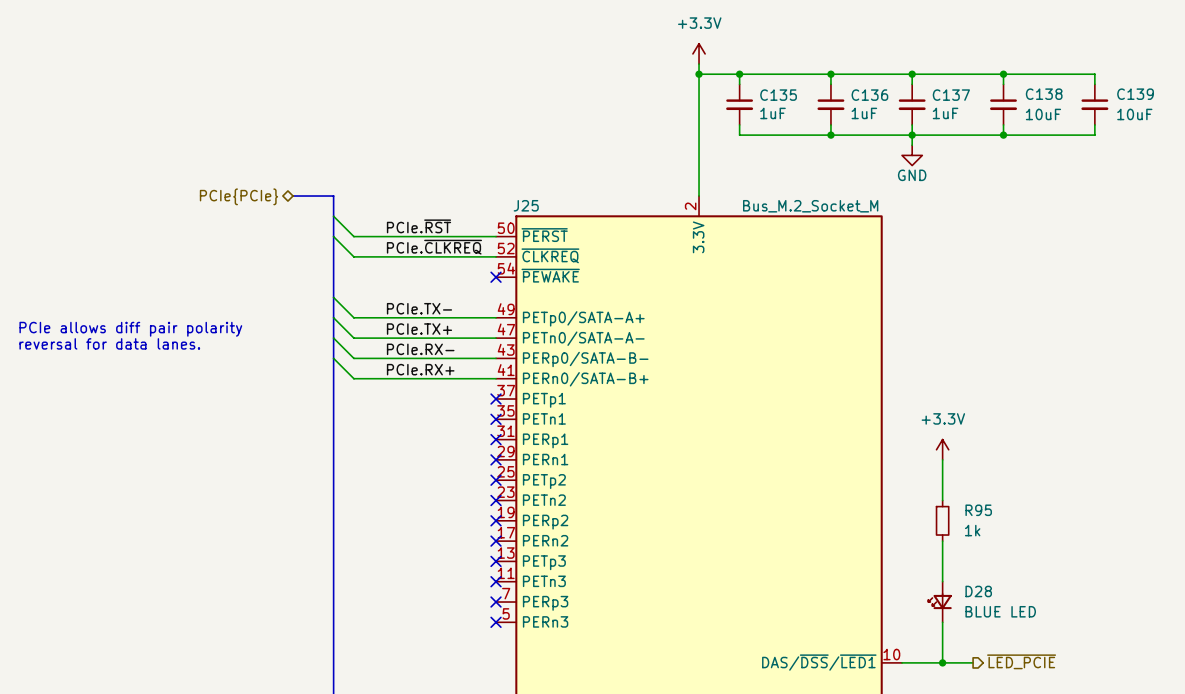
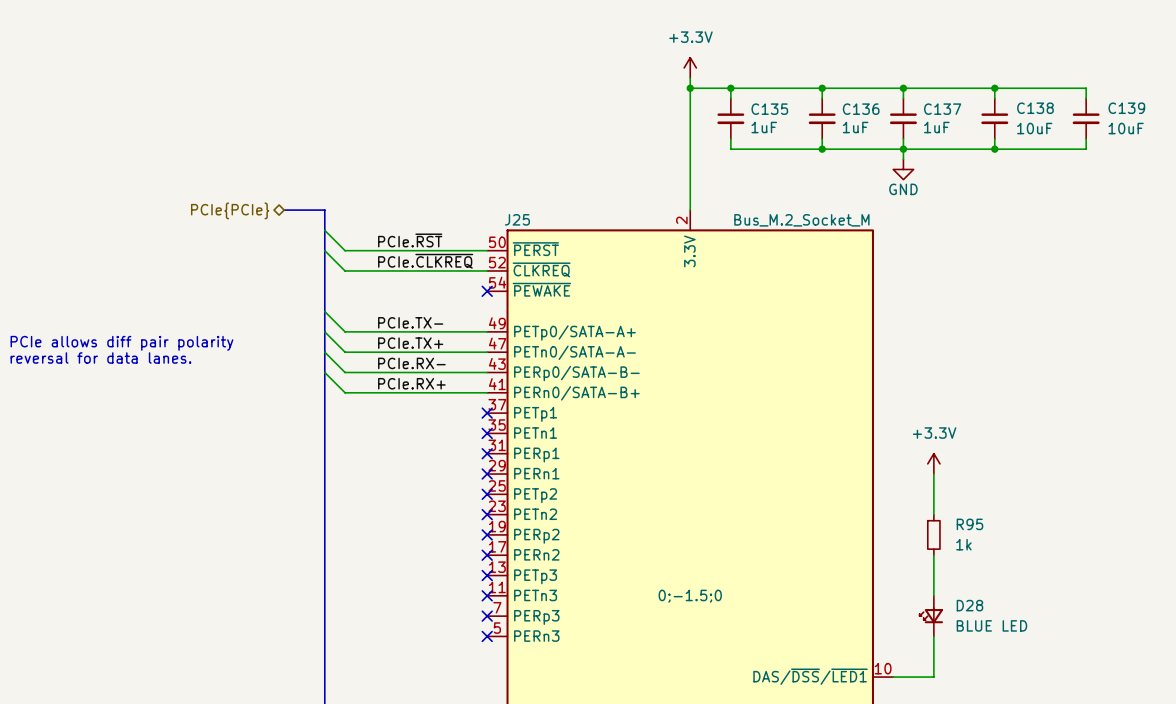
J25 text: none -> 0;-1.5;0 (690, 596)
hierarchical label: ~{LED_PCIE} (1021, 661) -> none
wire: (942, 662) (973, 662) -> none
junction: (942, 662) -> none

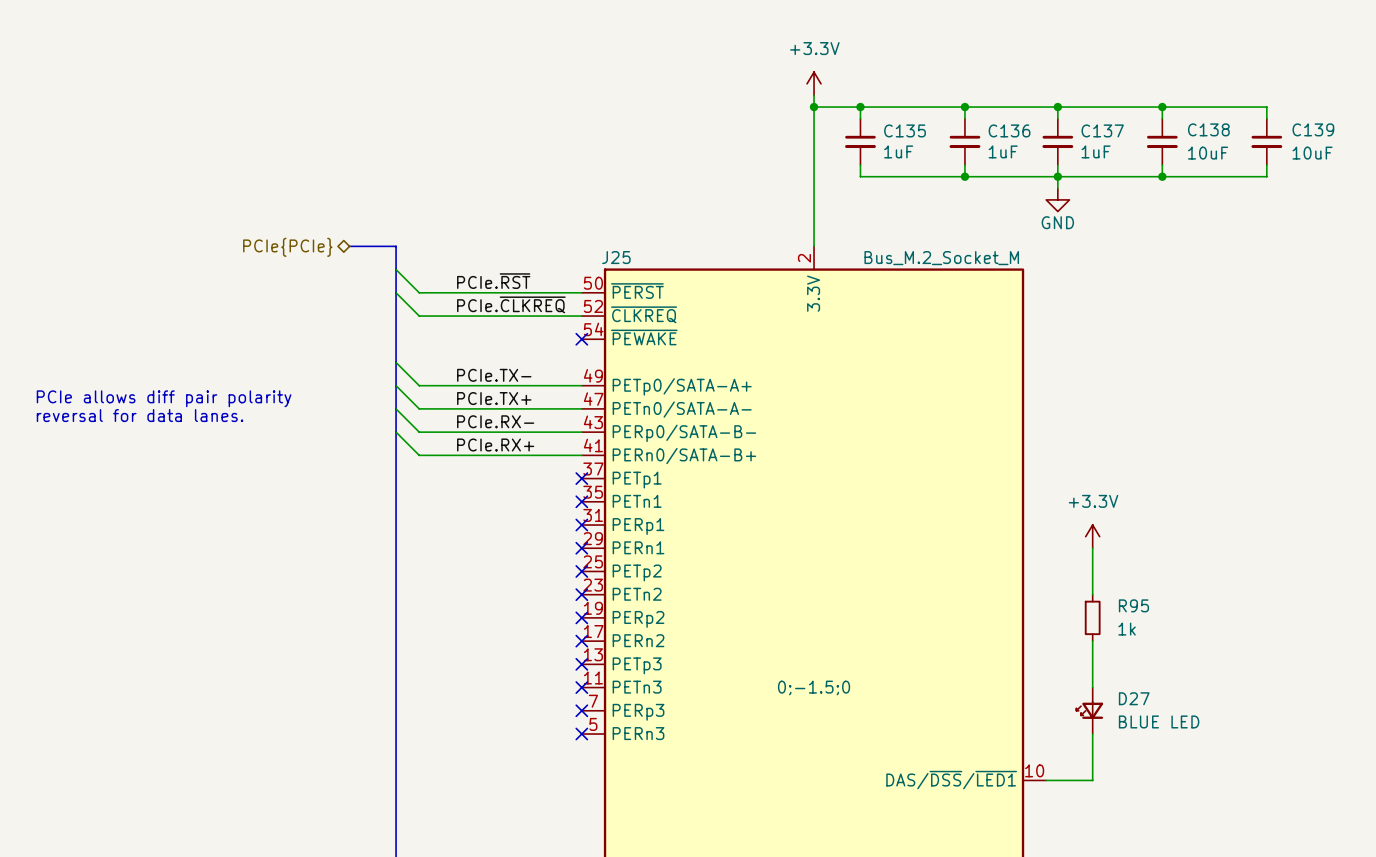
D28 name: D28 (969, 605) -> D27 (1134, 698)

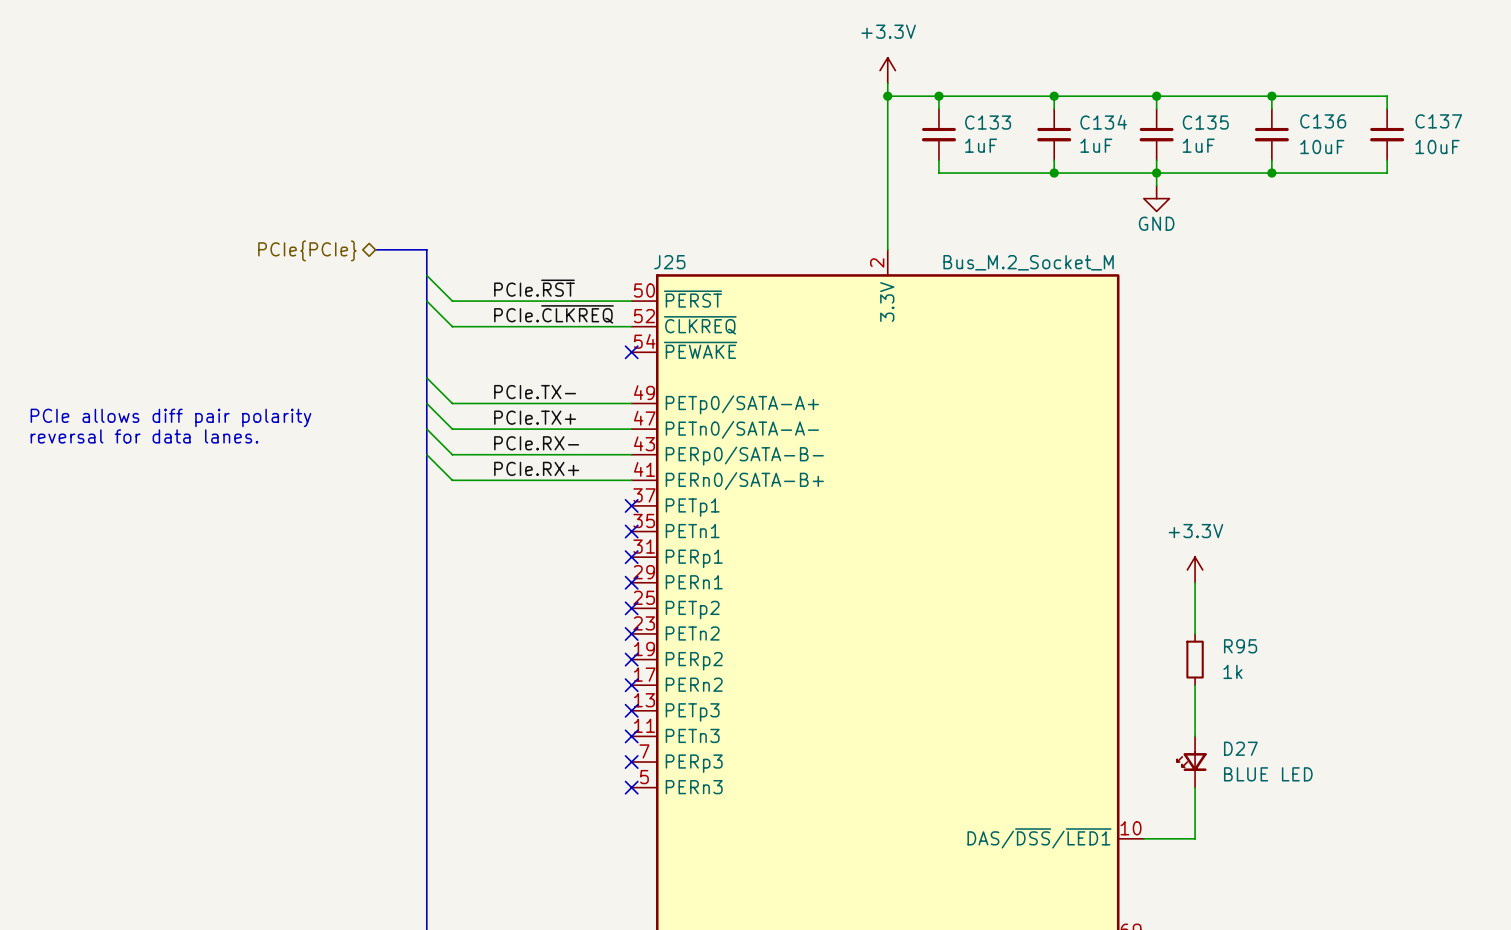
C138 name: C138 (1208, 129) -> C136 (1323, 121)
C139 name: C139 (1313, 129) -> C137 (1438, 121)
C135 name: C135 (905, 130) -> C133 (988, 122)
C136 name: C136 (1009, 130) -> C134 (1103, 122)
C137 name: C137 (1102, 130) -> C135 (1205, 122)
J25 text: 0;-1.5;0 (814, 687) -> none

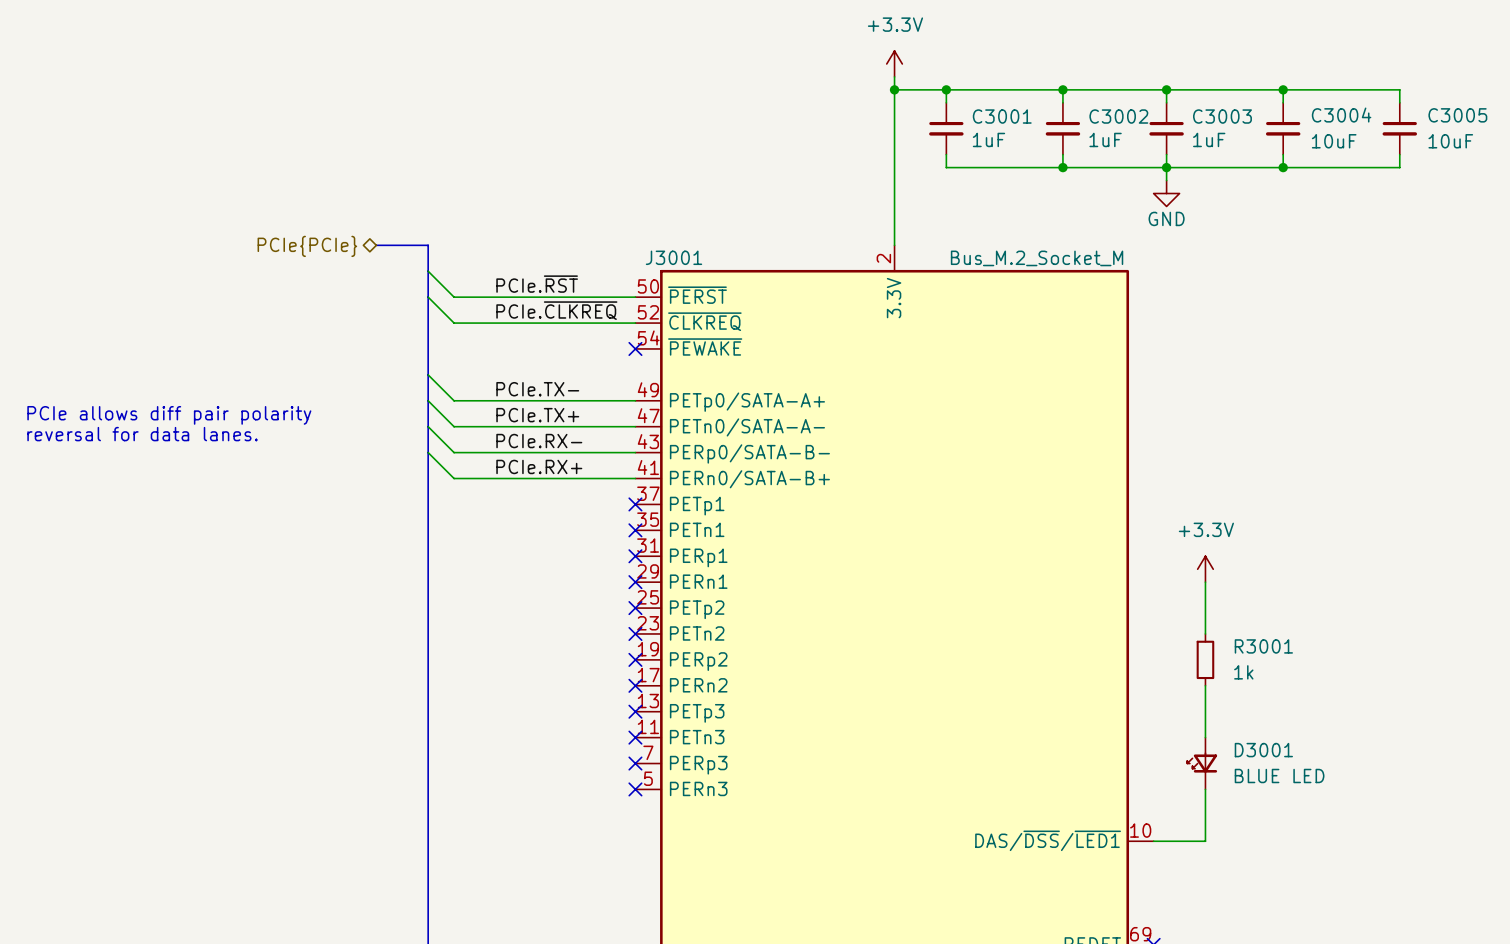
C136 name: C136 (1323, 121) -> C3004 (1341, 115)
C137 name: C137 (1438, 121) -> C3005 (1457, 115)
C133 name: C133 (988, 122) -> C3001 (1002, 116)
C134 name: C134 (1103, 122) -> C3002 (1118, 116)
C135 name: C135 (1205, 122) -> C3003 (1222, 116)
J25 name: J25 (669, 262) -> J3001 (674, 257)
R95 name: R95 (1240, 646) -> R3001 (1263, 646)
D27 name: D27 (1240, 748) -> D3001 (1263, 750)

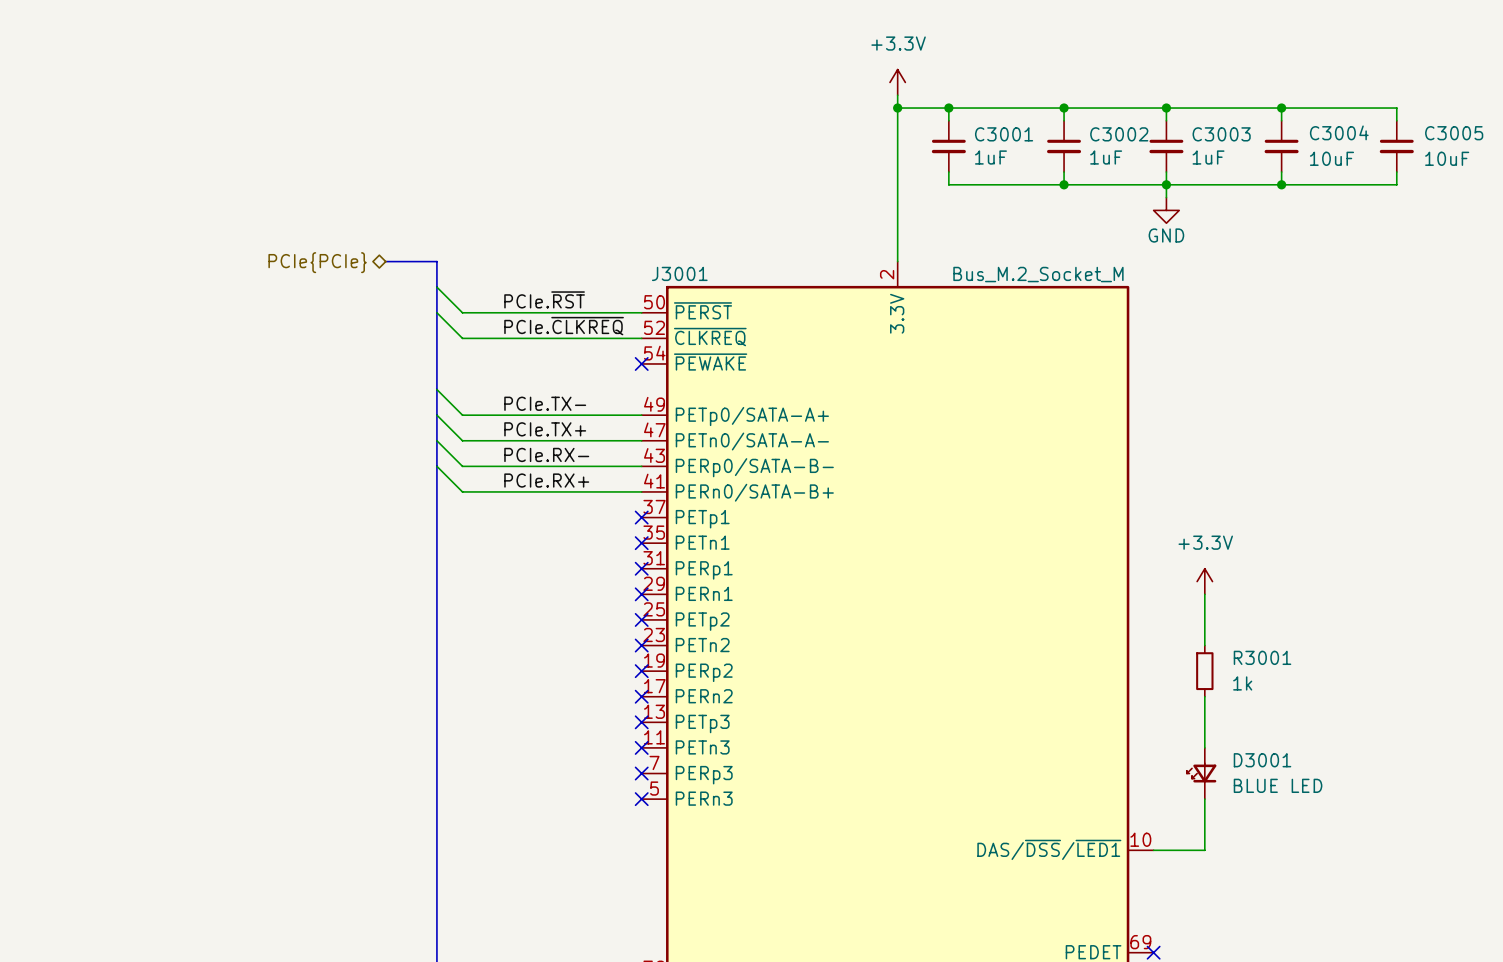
text: PCIe allows diff pair polarity (169, 415) -> none
text: reversal for data lanes. (142, 434) -> none

